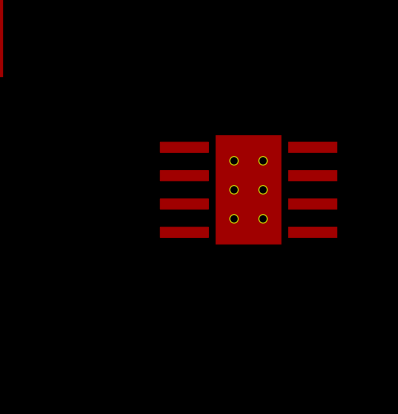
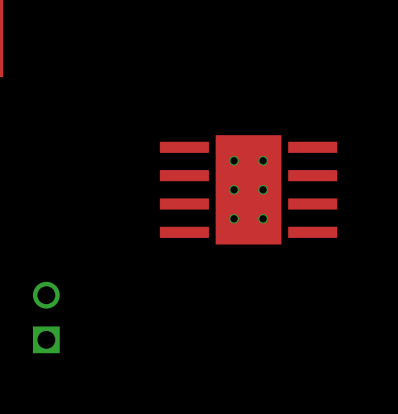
part: none -> (46, 317)

